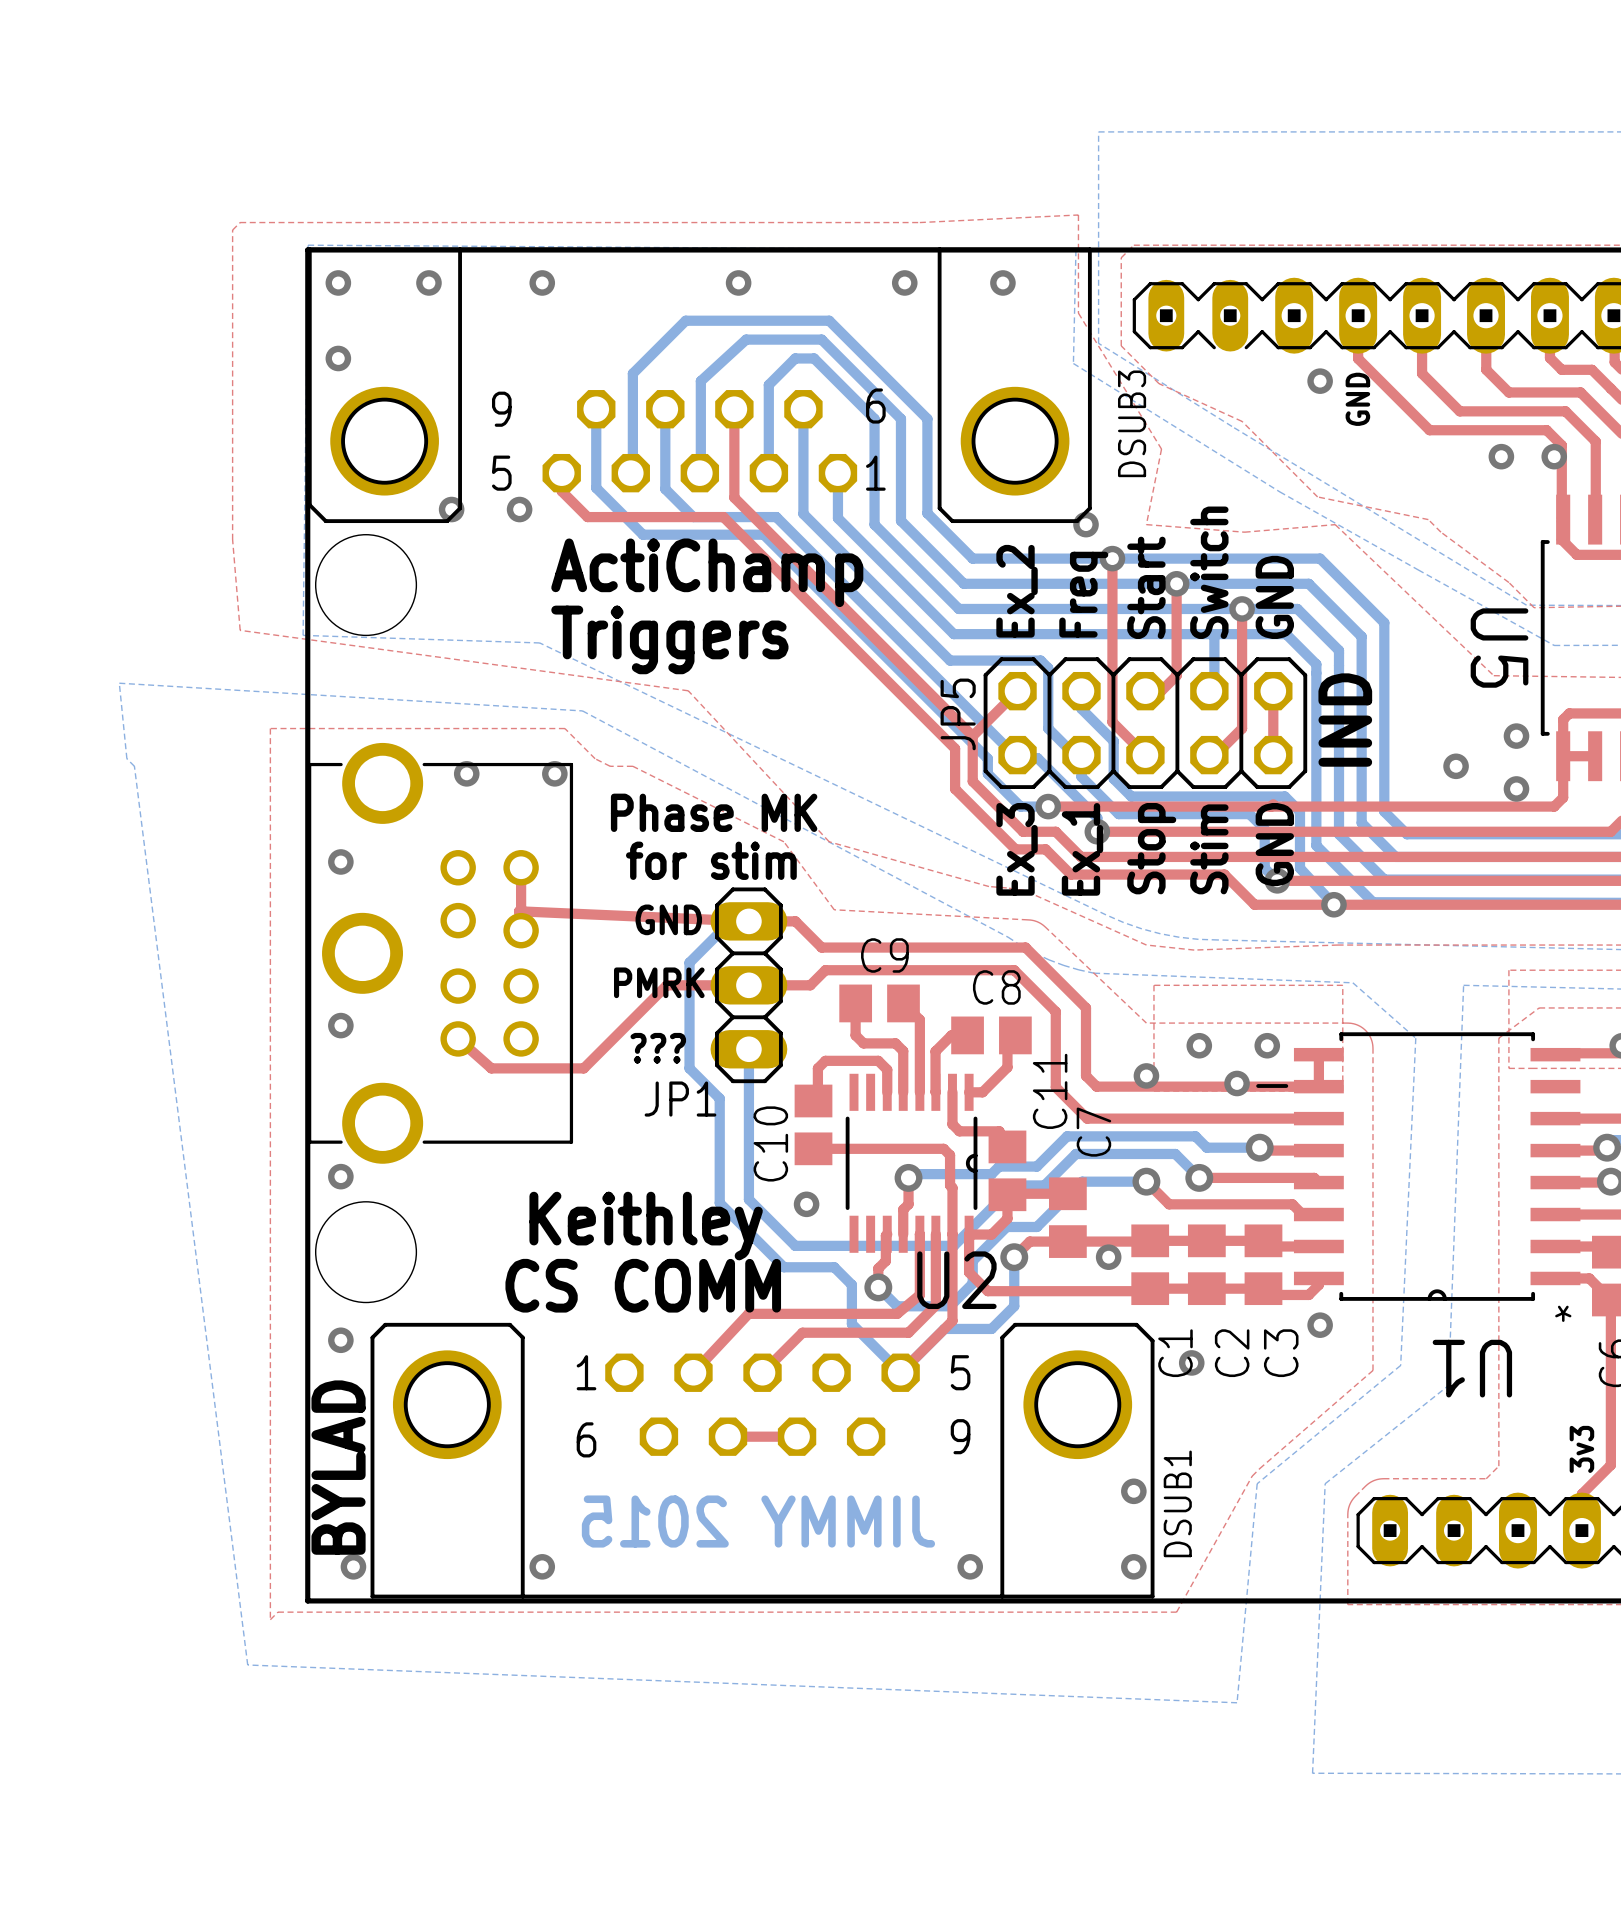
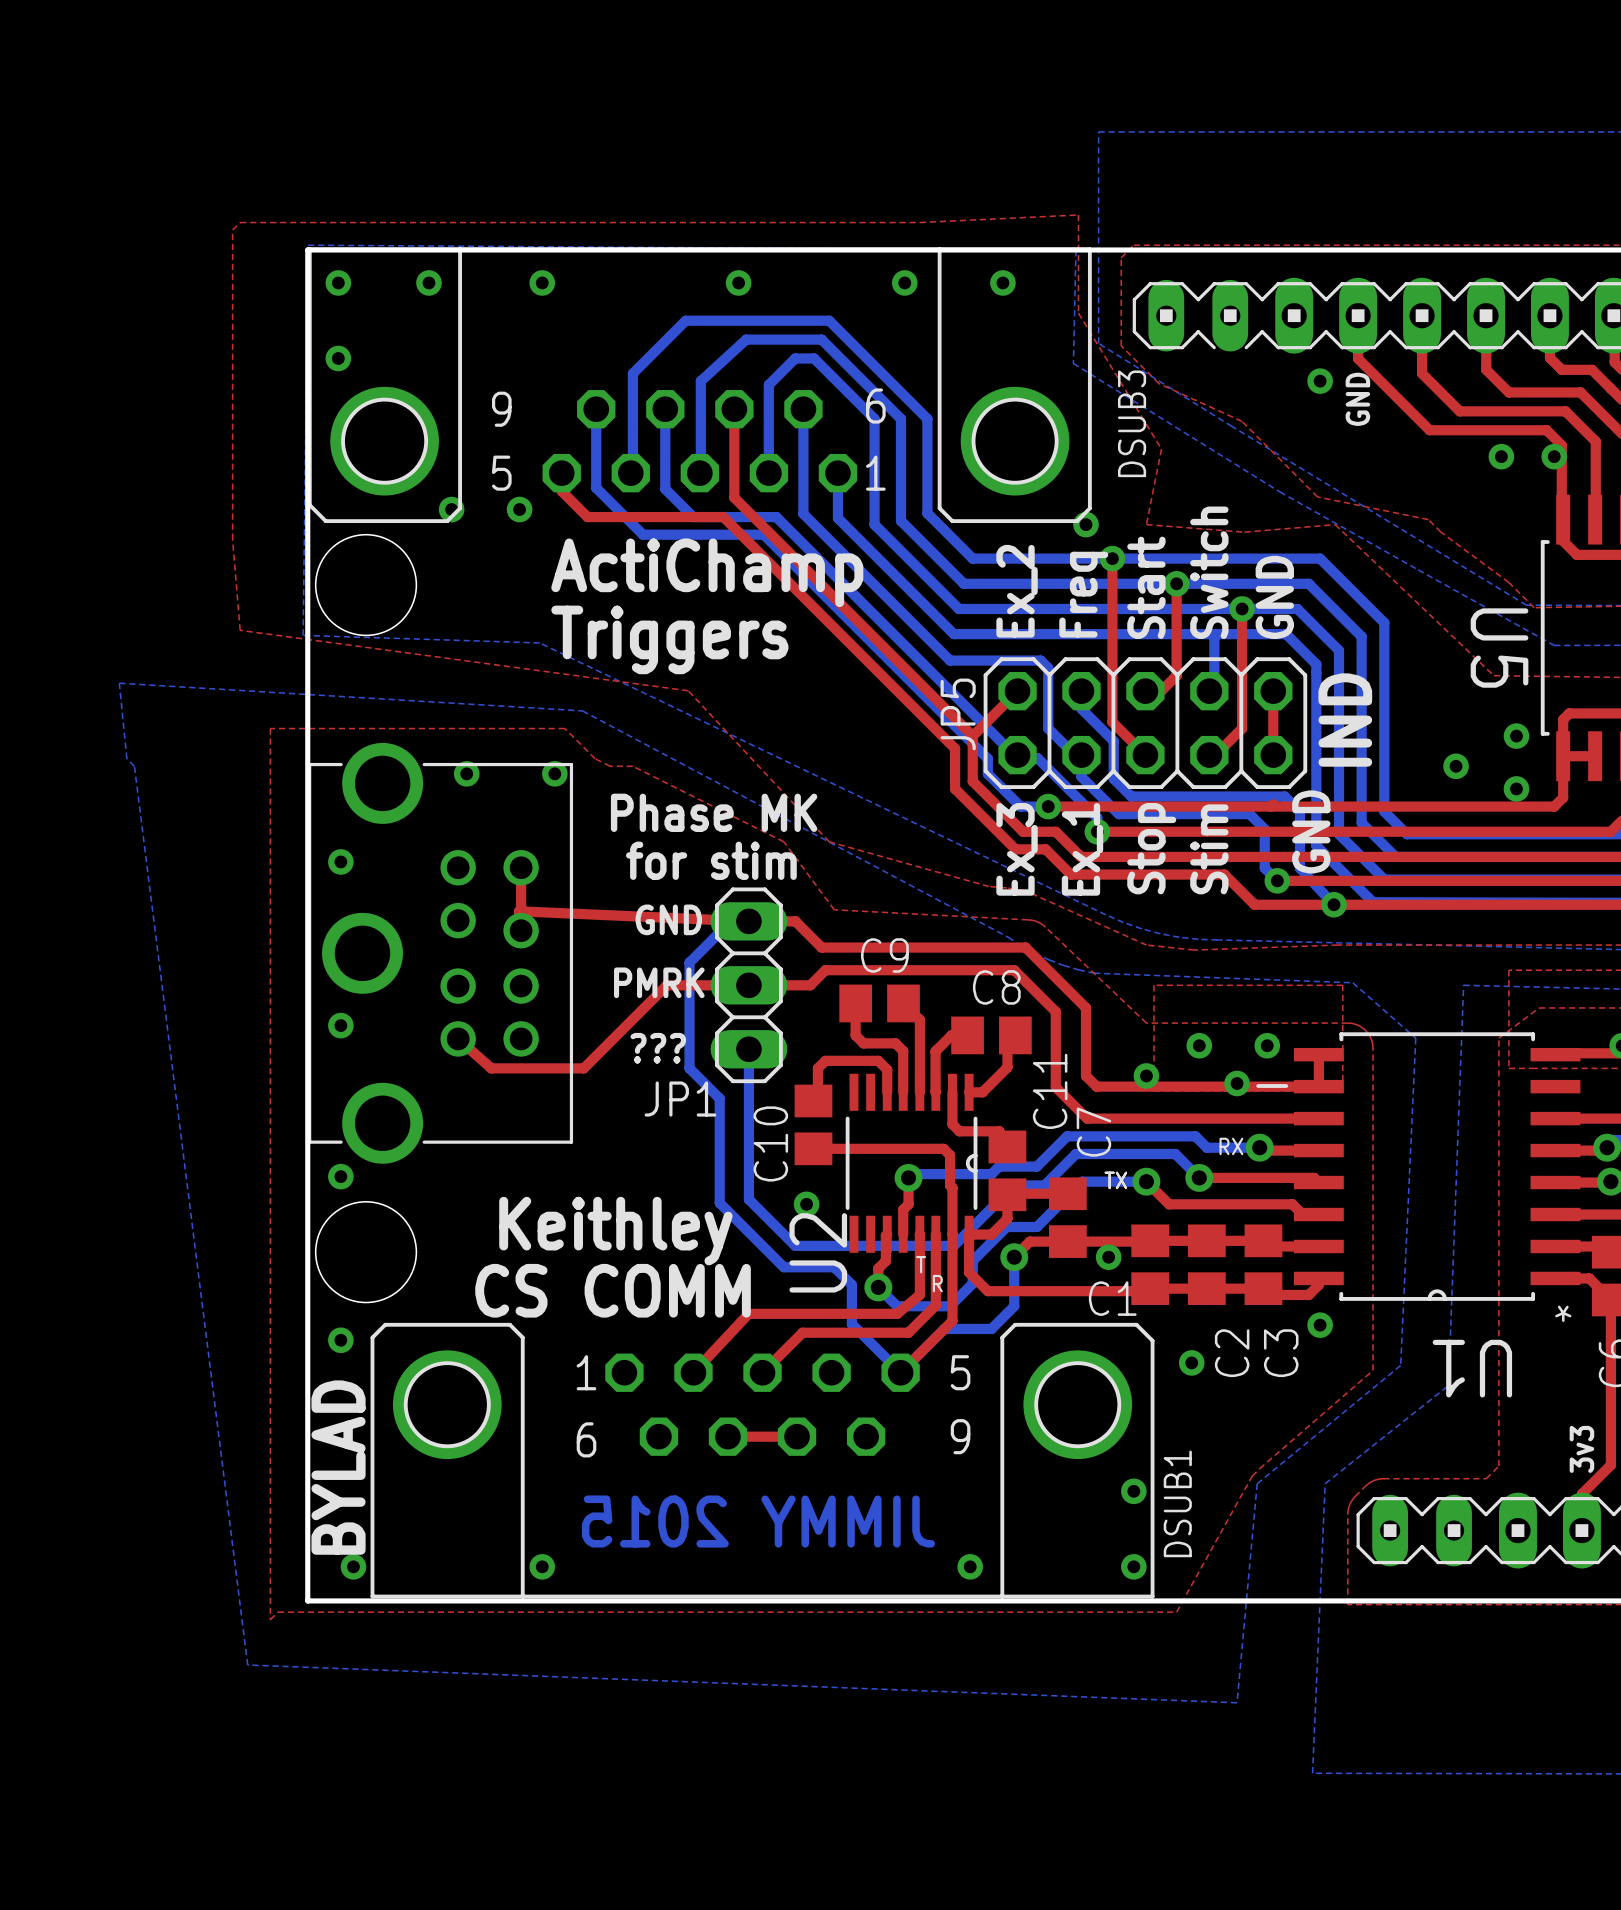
text position: GND (1274, 844) -> GND (1311, 831)
text: none -> RX (1231, 1146)
text: none -> TX (1115, 1180)
text position: Keithley (646, 1226) -> Keithley (615, 1231)
text: none -> T (921, 1264)
U2 name rotation: 0° (956, 1280) -> 90° counterclockwise (818, 1252)
U2 name position: U2 (956, 1280) -> U2 (818, 1252)
text: none -> R (937, 1283)
text position: CS COMM (643, 1285) -> CS COMM (613, 1290)
C1 name rotation: 0° (1175, 1353) -> 90° clockwise (1112, 1298)
C1 name position: C1 (1175, 1353) -> C1 (1112, 1298)

